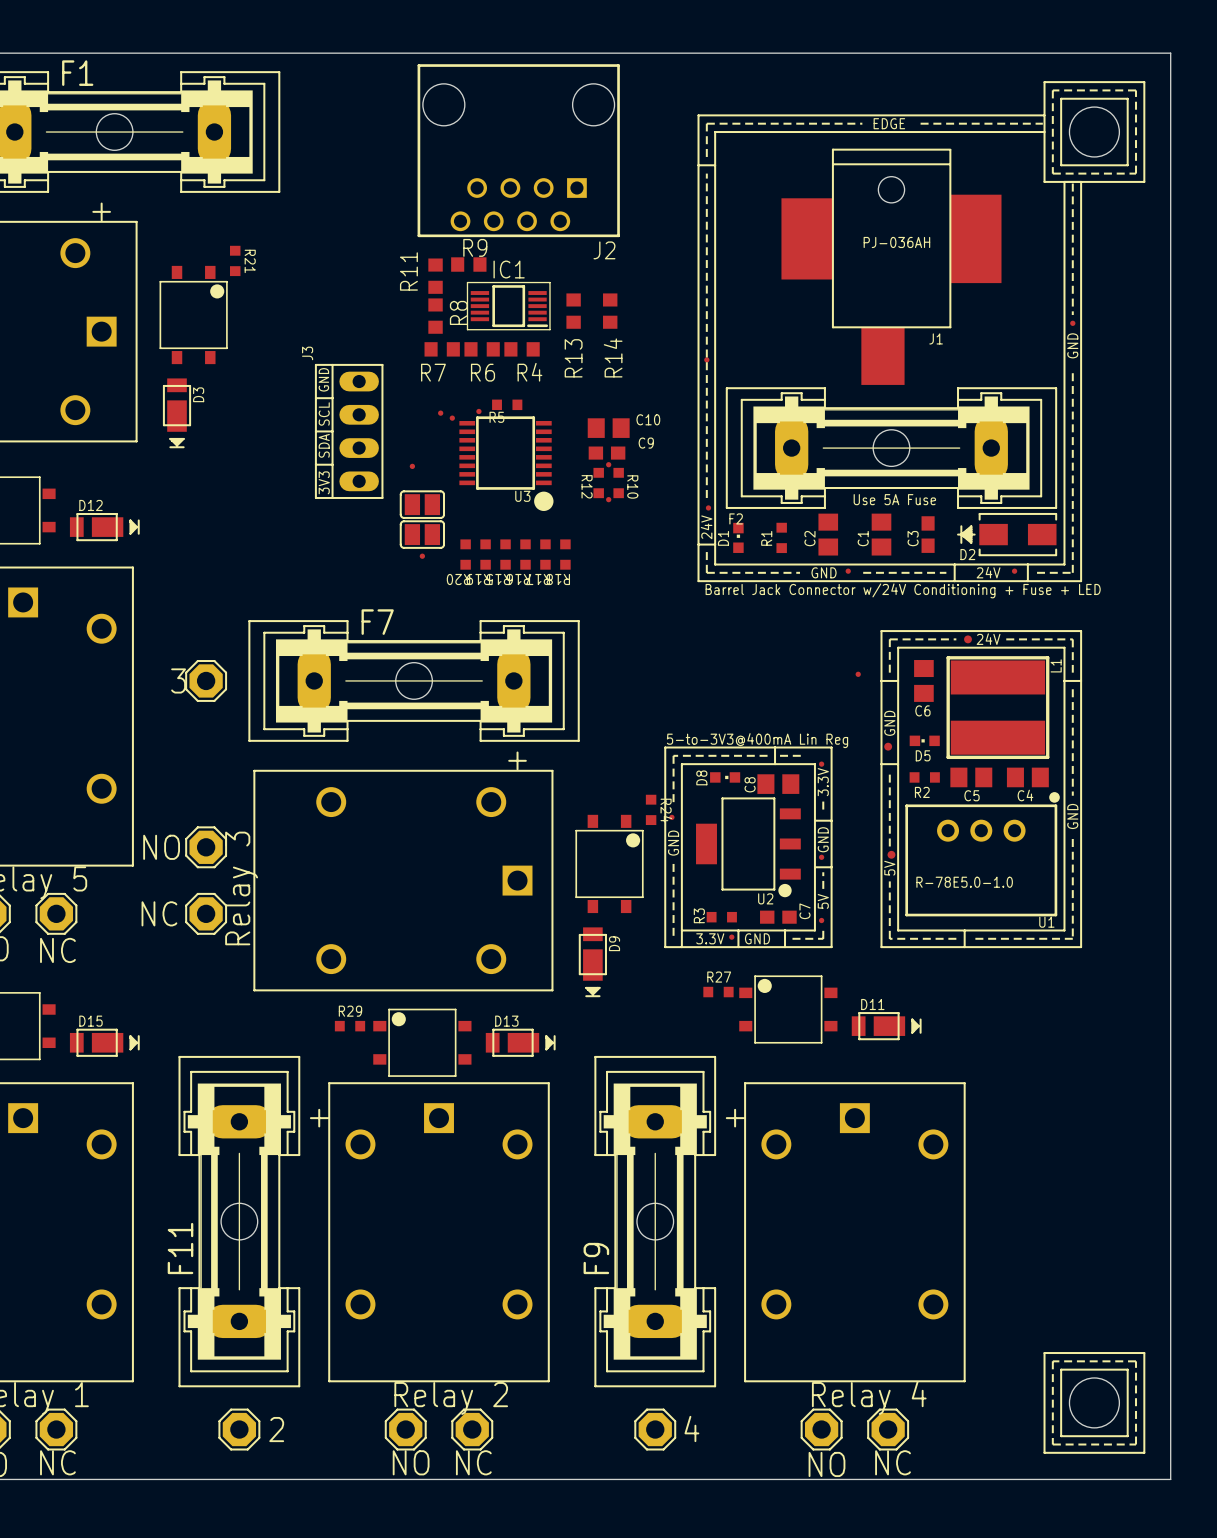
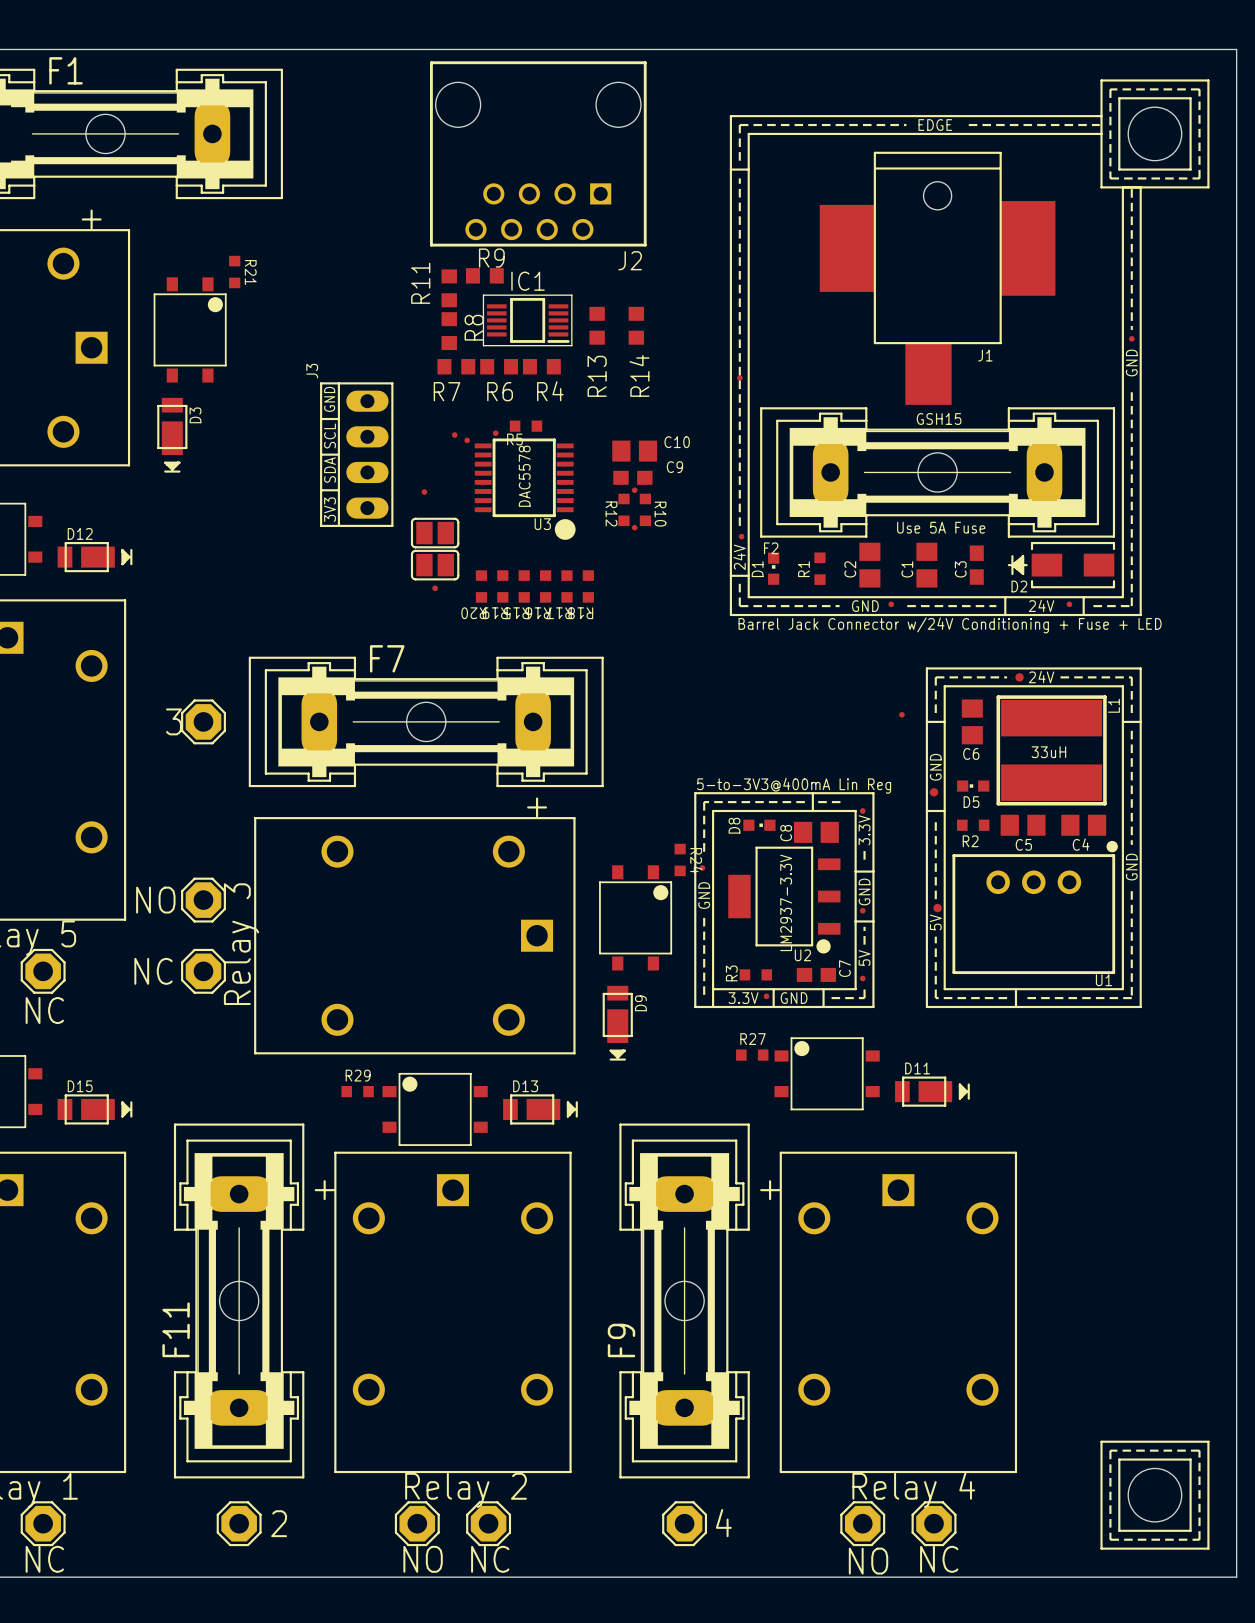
J1 value: PJ-036AH (896, 242) -> none
F2 value: none -> GSH15 (939, 419)
U3 value: none -> DAC5578 (524, 476)
L1 value: none -> 33uH (1048, 752)
U2 value: none -> LM2937-3.3V (786, 902)
U1 value: R-78E5.0-1.0 (964, 882) -> none

